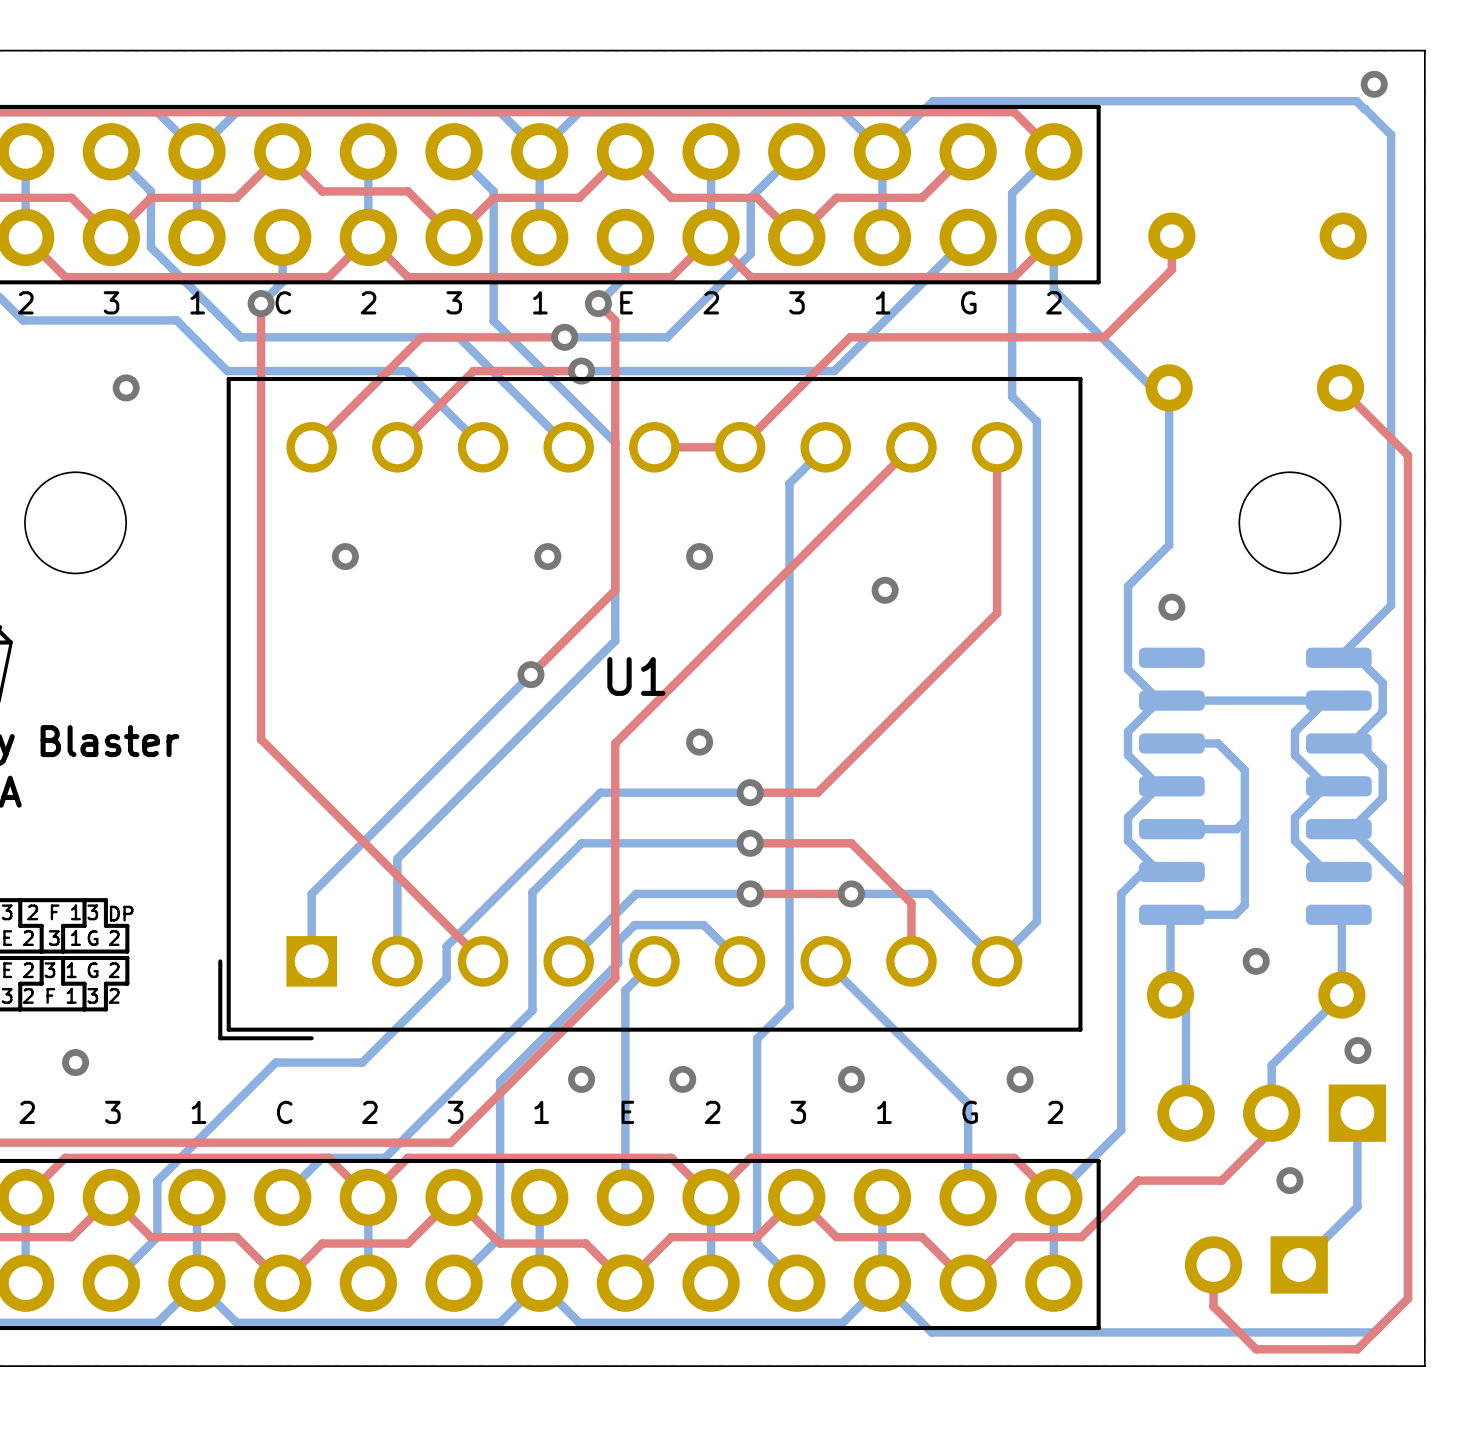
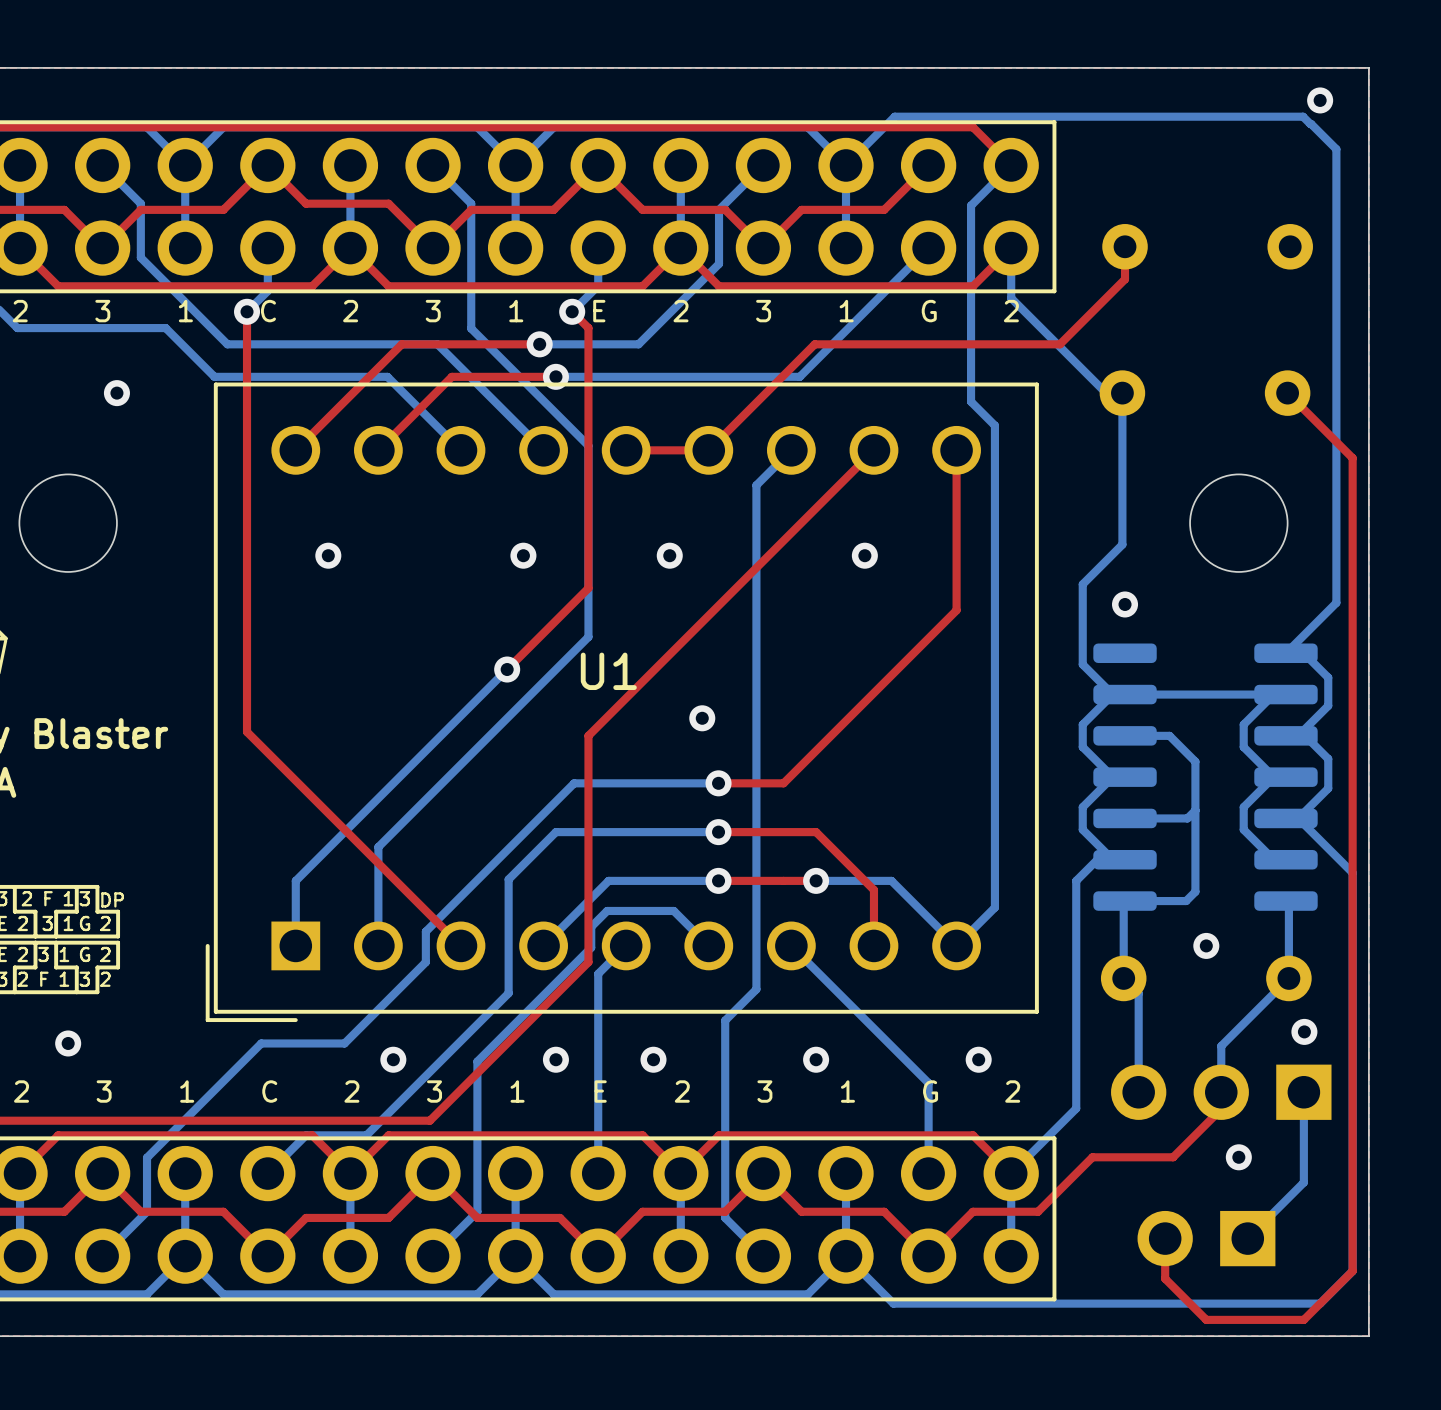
via position: (885, 590) -> (864, 555)
via position: (699, 742) -> (702, 718)
via: none -> (393, 1059)

